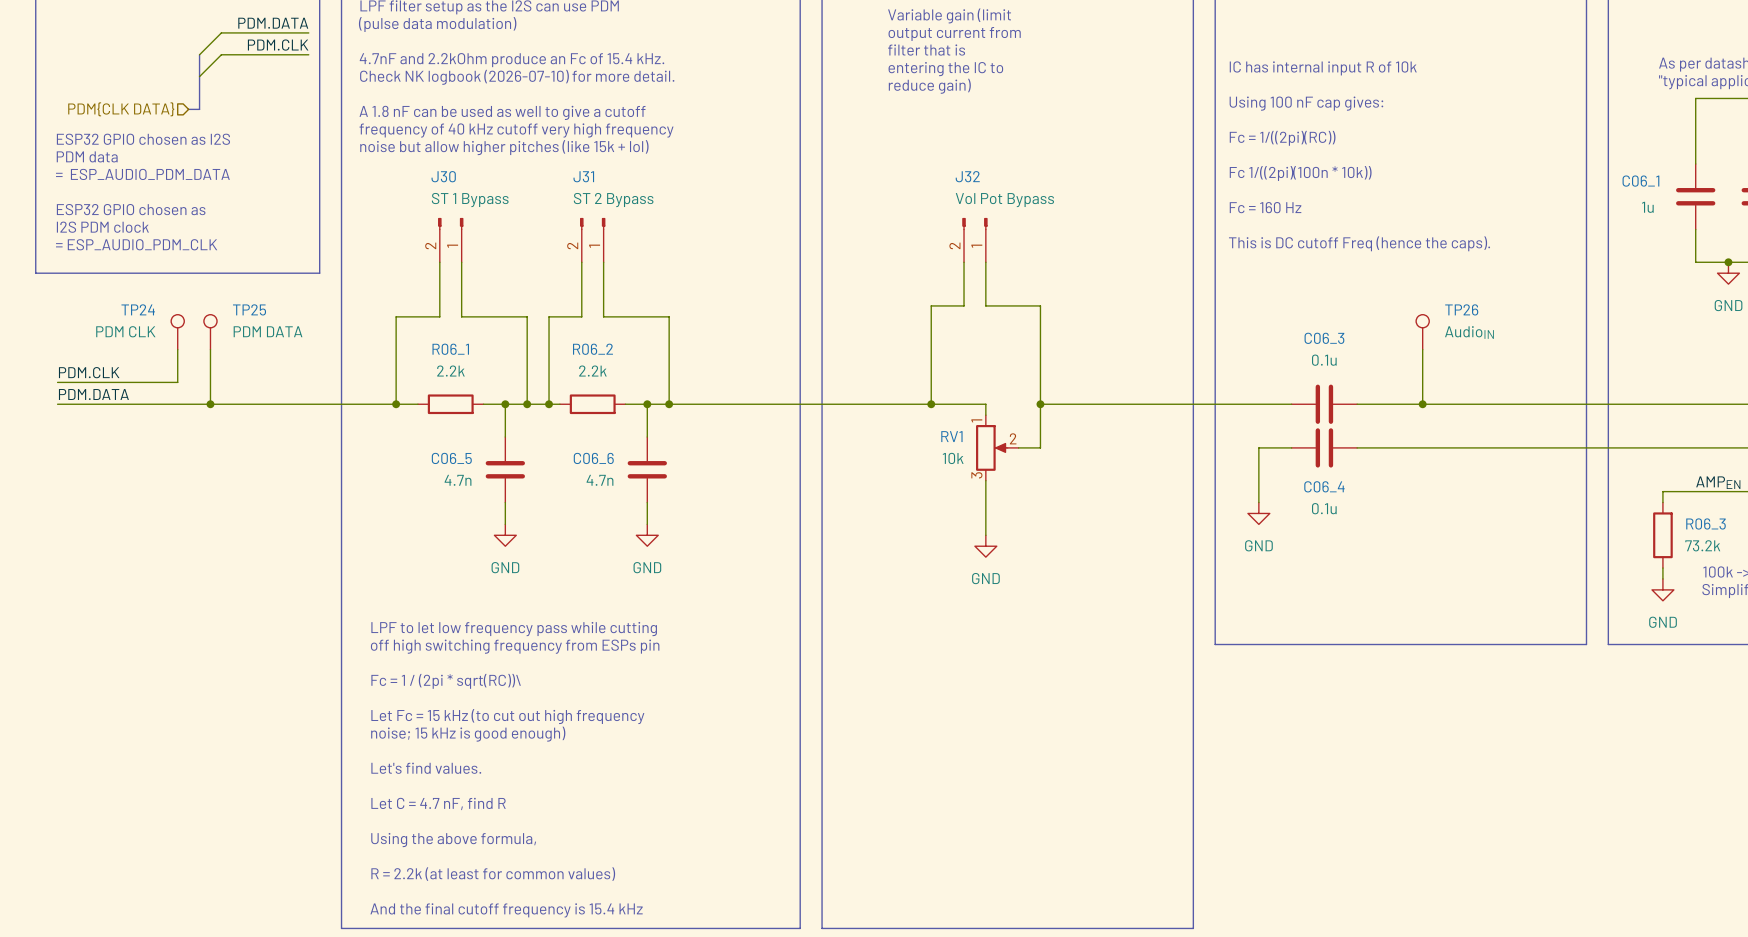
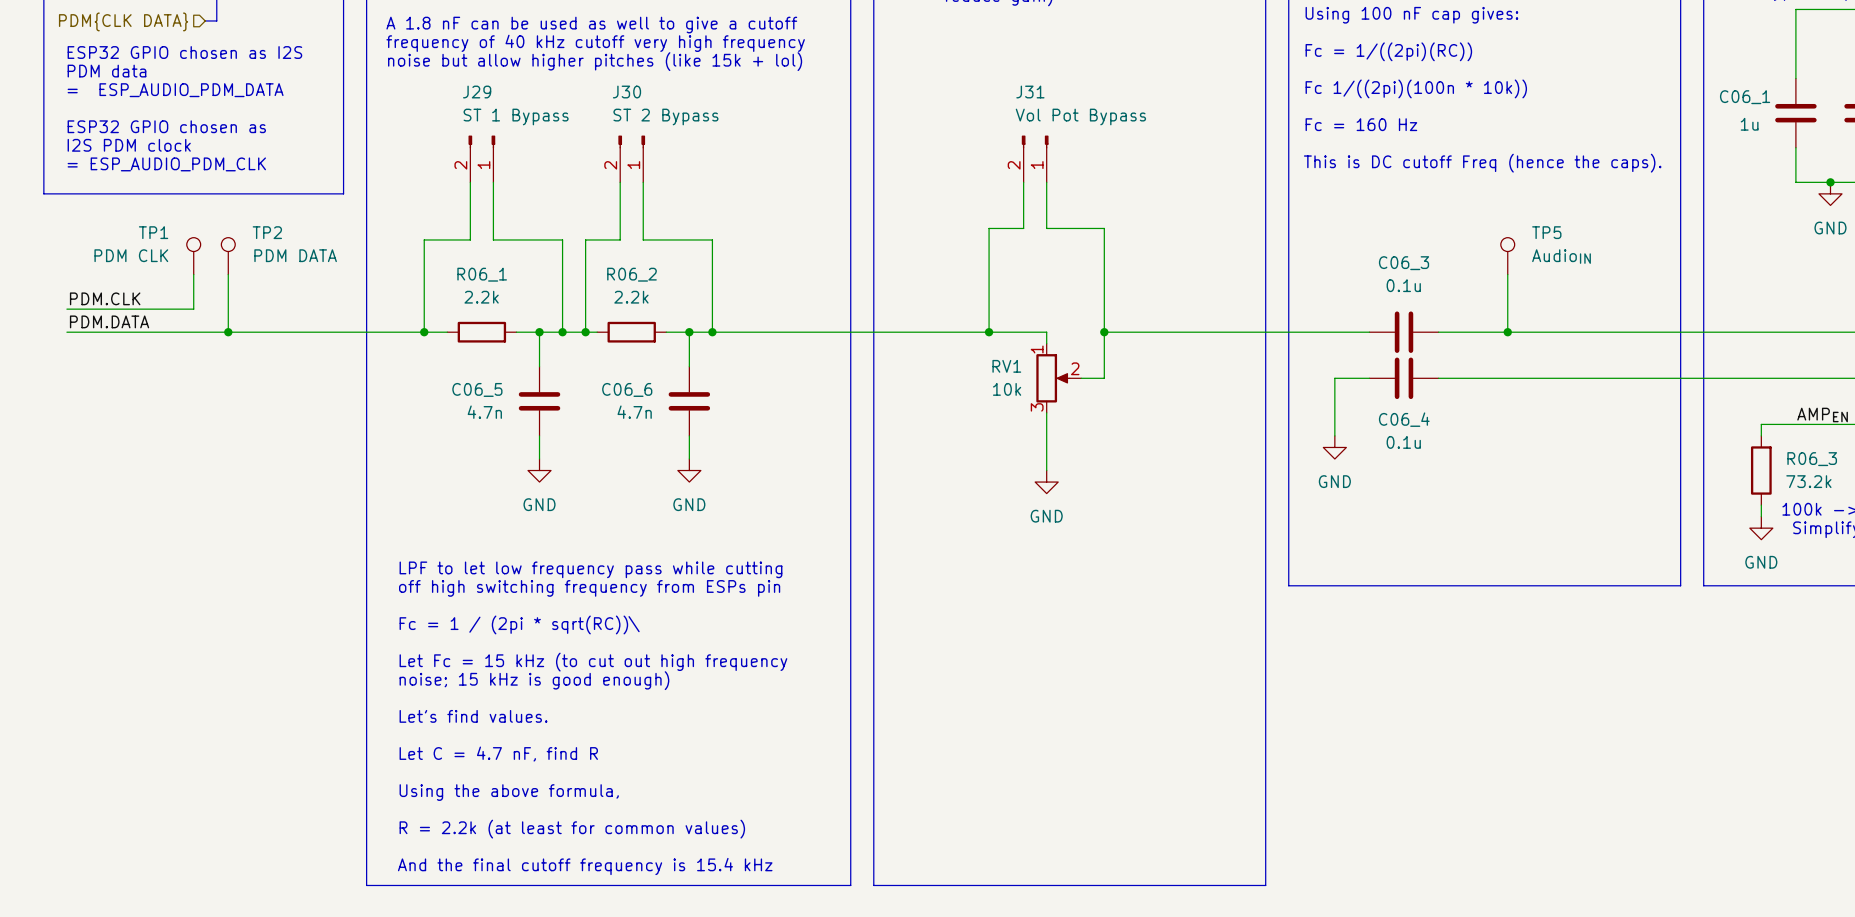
J30 name: J30 (443, 176) -> J29 (477, 92)
J31 name: J31 (583, 176) -> J30 (626, 92)
J32 name: J32 (967, 176) -> J31 (1030, 92)
TP24 name: TP24 (138, 309) -> TP1 (153, 232)
TP25 name: TP25 (249, 309) -> TP2 (267, 232)
TP26 name: TP26 (1461, 309) -> TP5 (1546, 232)

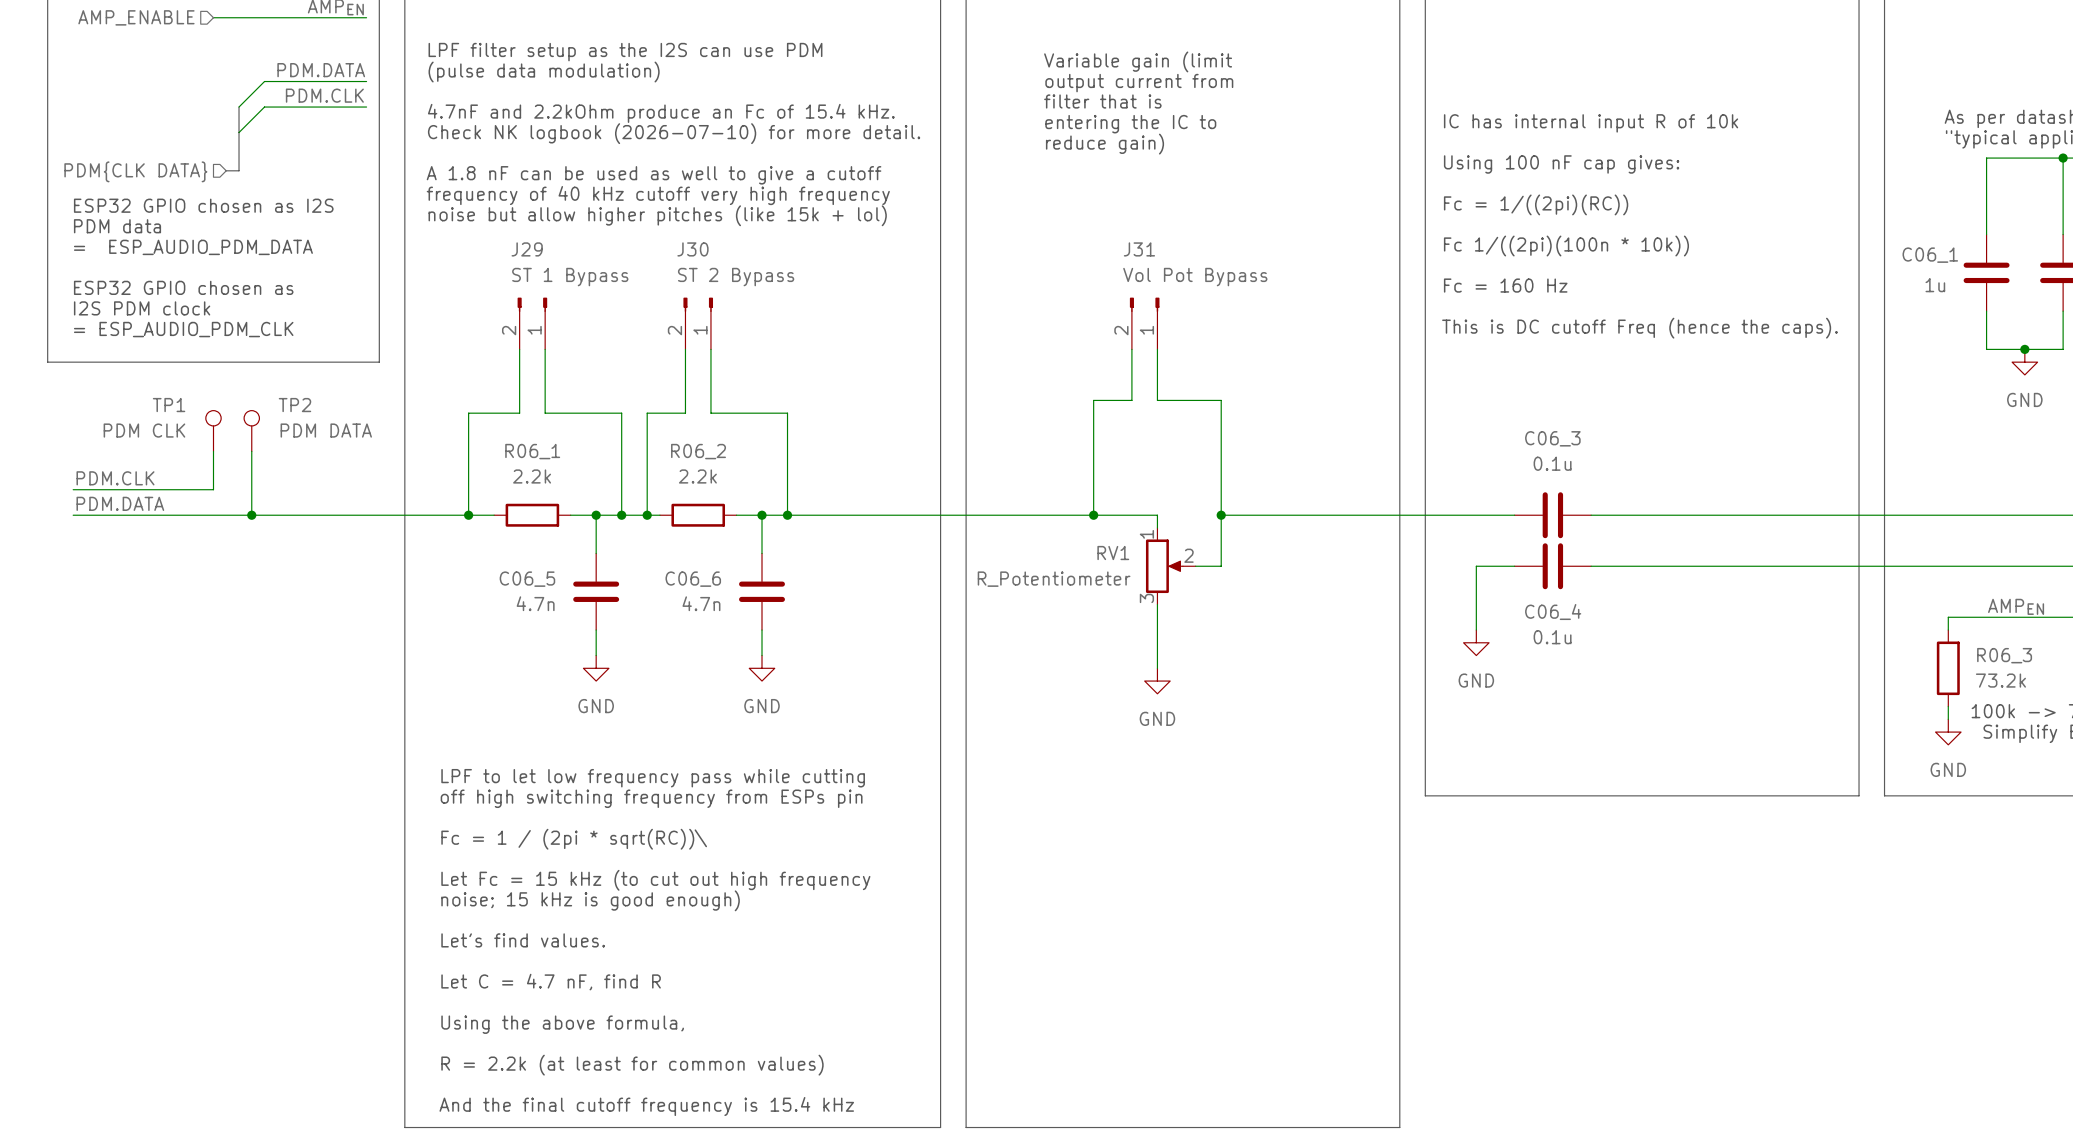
TP5: AudioIN (1507, 256) -> none
wire: (1507, 274) (1507, 332) -> none
junction: (1507, 332) -> none
RV1 value: 10k (1007, 389) -> R_Potentiometer (1054, 579)

